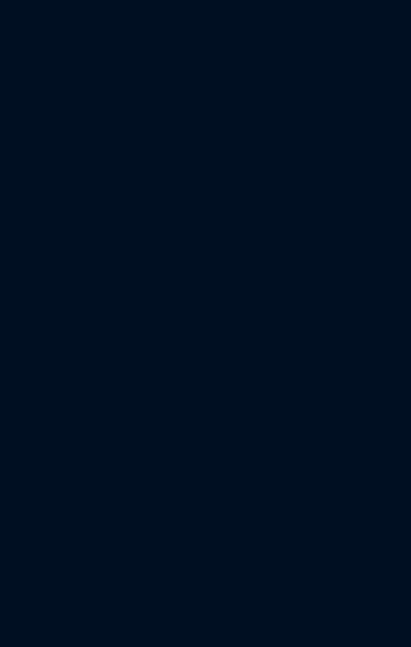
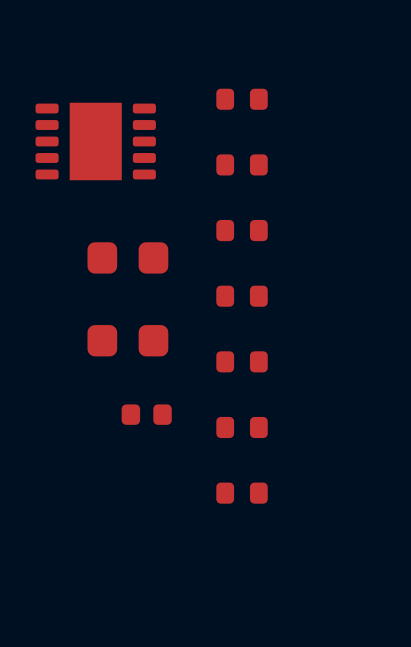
part: none -> (242, 99)
part: none -> (95, 141)
part: none -> (242, 164)
part: none -> (242, 230)
part: none -> (127, 257)
part: none -> (242, 296)
part: none -> (127, 340)
part: none -> (242, 361)
part: none -> (146, 414)
part: none -> (242, 427)
part: none -> (242, 493)

